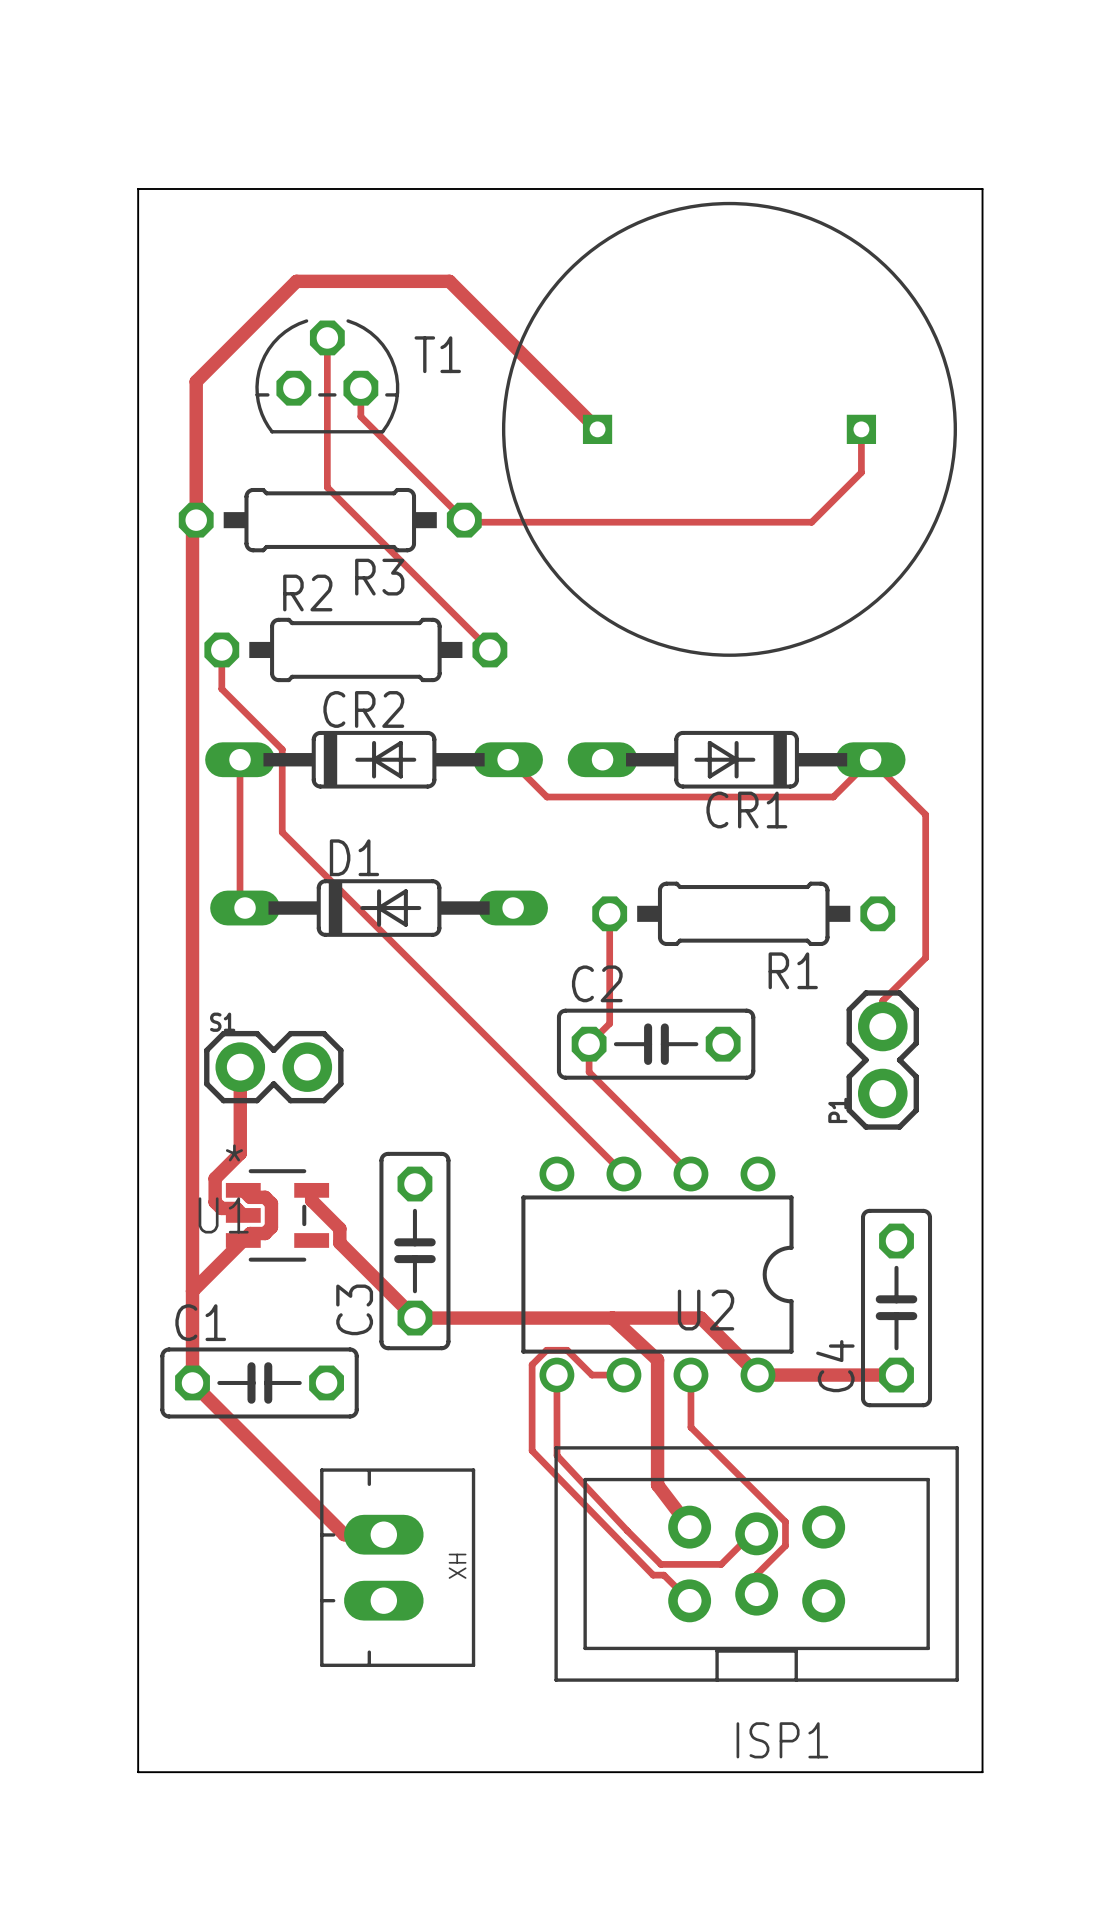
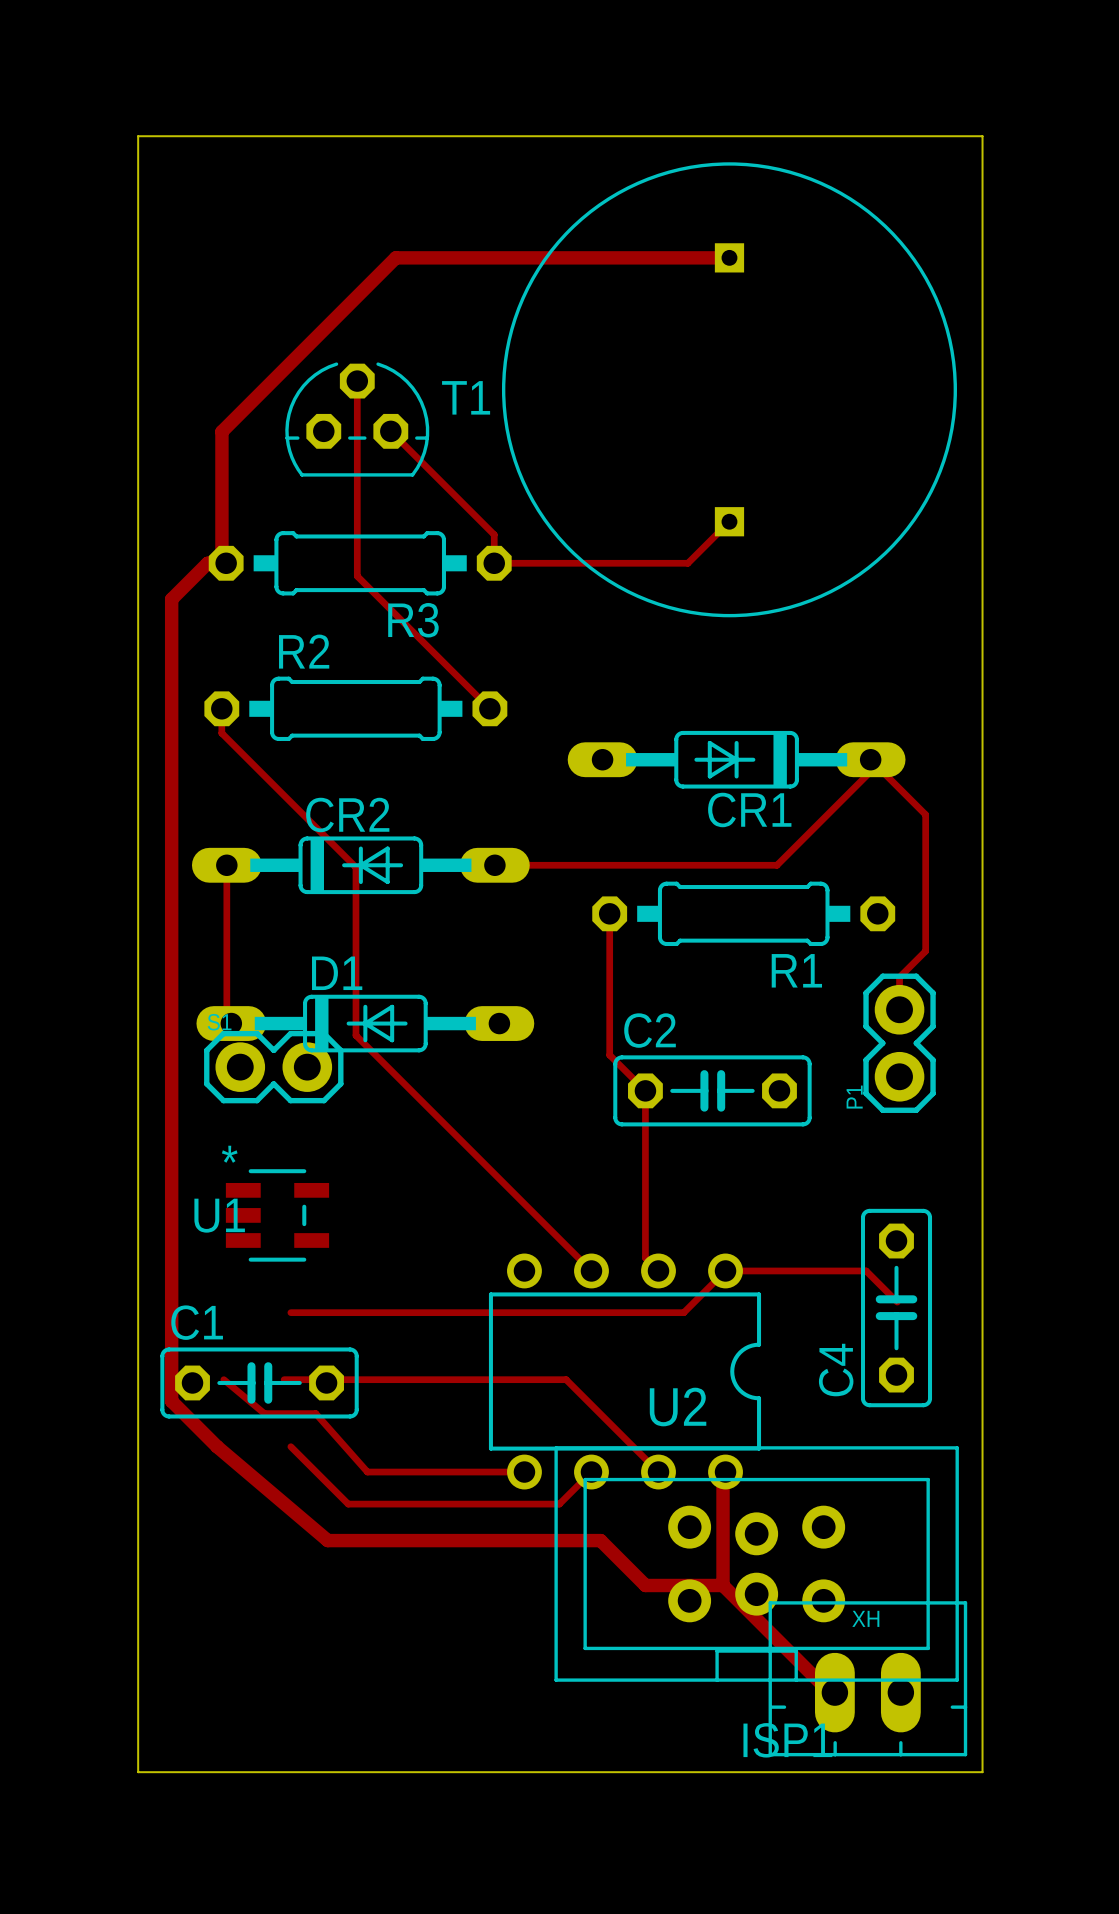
board edge: (138, 188) (982, 188) -> (138, 188) (138, 136) (982, 136) (982, 188)
track: none -> (729, 257) (395, 257) (221, 431) (221, 559) (226, 563) (207, 563) (171, 599) (171, 1401) (217, 1446) (327, 1540) (600, 1540) (645, 1585) (723, 1585)
T1 footprint: [255, 319, 400, 434] -> [285, 362, 430, 477]
track: (327, 337) (327, 487) (489, 649) -> none
track: none -> (357, 381) (357, 576) (489, 708)
track: (360, 388) (360, 416) (466, 522) (811, 522) (861, 472) (861, 429) -> none
track: (597, 429) (449, 281) (296, 281) (196, 381) (196, 520) (192, 523) (192, 1382) (344, 1534) (383, 1534) -> none
part rotation: 0° (729, 429) -> 90° clockwise (729, 389)
track: none -> (390, 431) (494, 534) (494, 563) (687, 563) (729, 521)
R3 position: (330, 520) -> (360, 563)
track: (221, 649) (221, 689) (282, 749) (282, 832) (623, 1174) -> none
R2 position: (355, 649) -> (355, 708)
track: none -> (221, 708) (221, 733) (355, 867) (355, 1035) (591, 1270)
track: (240, 759) (240, 903) (245, 908) -> none
CR2 position: (374, 759) -> (360, 865)
track: (508, 759) (546, 797) (833, 797) (870, 759) -> none
track: none -> (876, 765) (776, 865) (494, 865)
track: none -> (226, 865) (226, 1019) (231, 1023)
D1 position: (379, 908) -> (365, 1023)
track: (925, 951) (925, 957) (882, 1000) (882, 1026) -> (925, 951) (899, 977) (899, 1009)
track: (609, 1023) (589, 1044) (589, 1072) (690, 1174) -> (609, 1023) (609, 1055) (645, 1090) (645, 1257) (658, 1270)
C2 position: (656, 1044) -> (712, 1090)
P1 position: (882, 1060) -> (899, 1043)
track: (240, 1067) (240, 1153) (215, 1178) (215, 1202) (221, 1208) (236, 1208) (243, 1215) -> none
track: (243, 1190) (250, 1197) (265, 1197) (271, 1203) (271, 1227) (265, 1233) (250, 1233) (192, 1291) -> none
track: (311, 1190) (311, 1200) (339, 1228) (339, 1242) (414, 1318) (700, 1318) (757, 1375) (896, 1375) -> none
C3: (414, 1251) -> none
U2 position: (657, 1274) -> (624, 1371)
track: none -> (897, 1302) (866, 1270) (725, 1270) (683, 1312) (290, 1312)
track: (612, 1318) (657, 1360) (657, 1485) (689, 1527) -> none
track: (556, 1375) (557, 1455) (660, 1564) (721, 1564) (751, 1533) (756, 1533) -> none
track: (623, 1375) (591, 1375) (567, 1350) (546, 1350) (532, 1364) (532, 1450) (653, 1575) (663, 1575) (689, 1600) -> none
track: (690, 1375) (690, 1427) (785, 1521) (785, 1545) (756, 1574) (756, 1594) -> none
track: none -> (223, 1379) (264, 1413) (315, 1413) (367, 1472) (524, 1472)
track: none -> (284, 1379) (566, 1379) (658, 1472)
track: none -> (290, 1446) (348, 1504) (559, 1504) (591, 1472)
track: none -> (725, 1472) (723, 1474) (723, 1585)
part: (397, 1567) -> none
track: none -> (723, 1585) (830, 1692) (834, 1692)
part: none -> (867, 1678)

